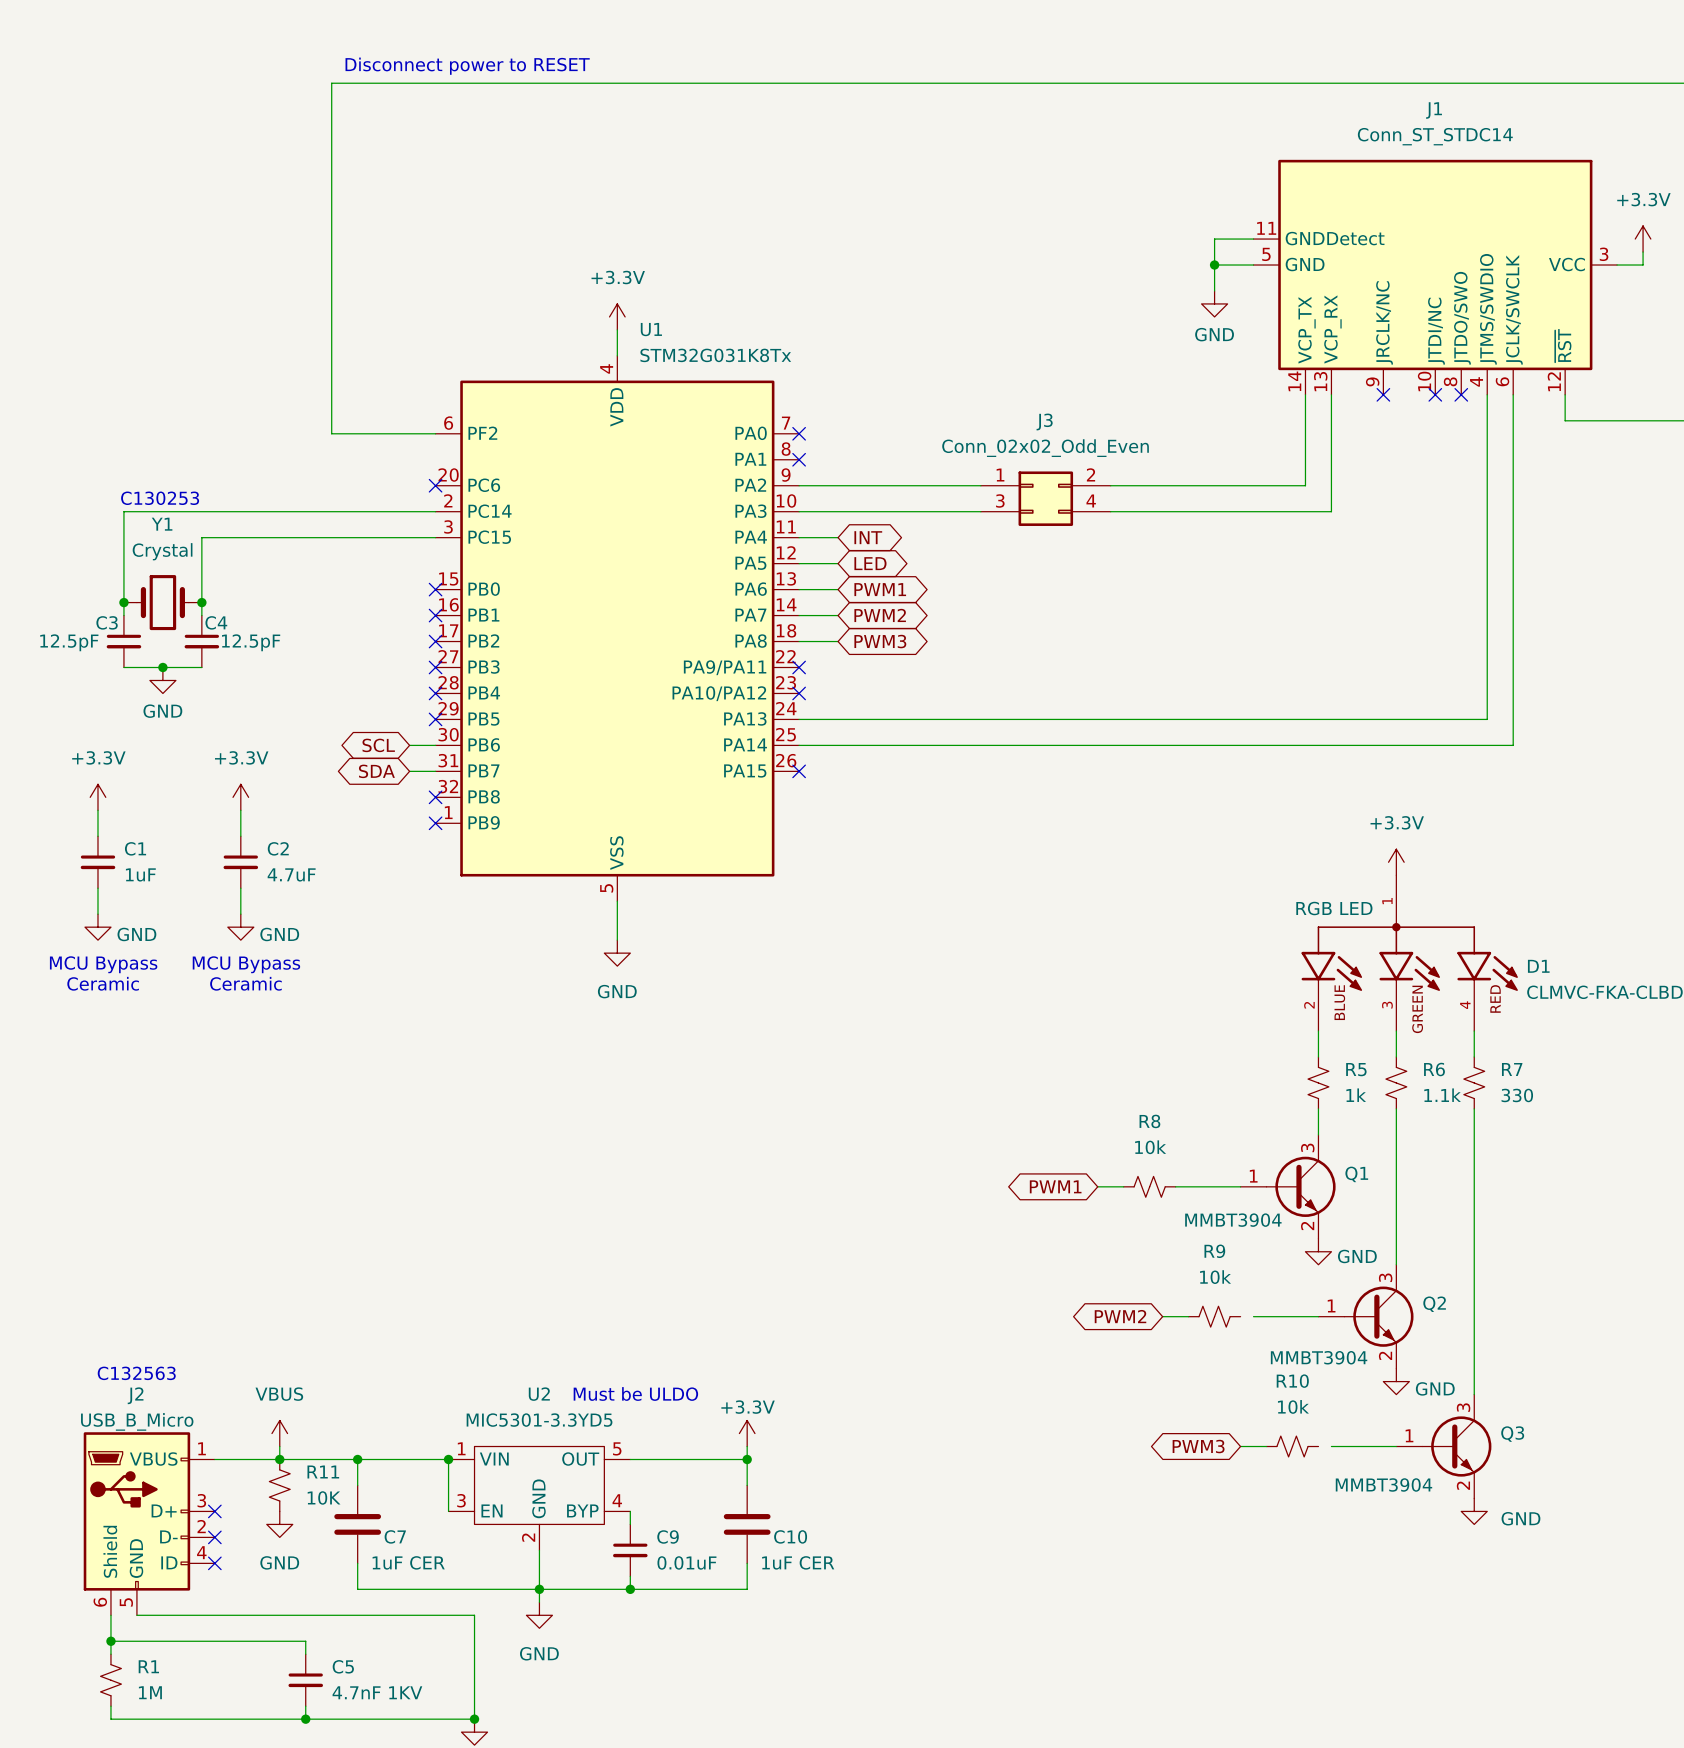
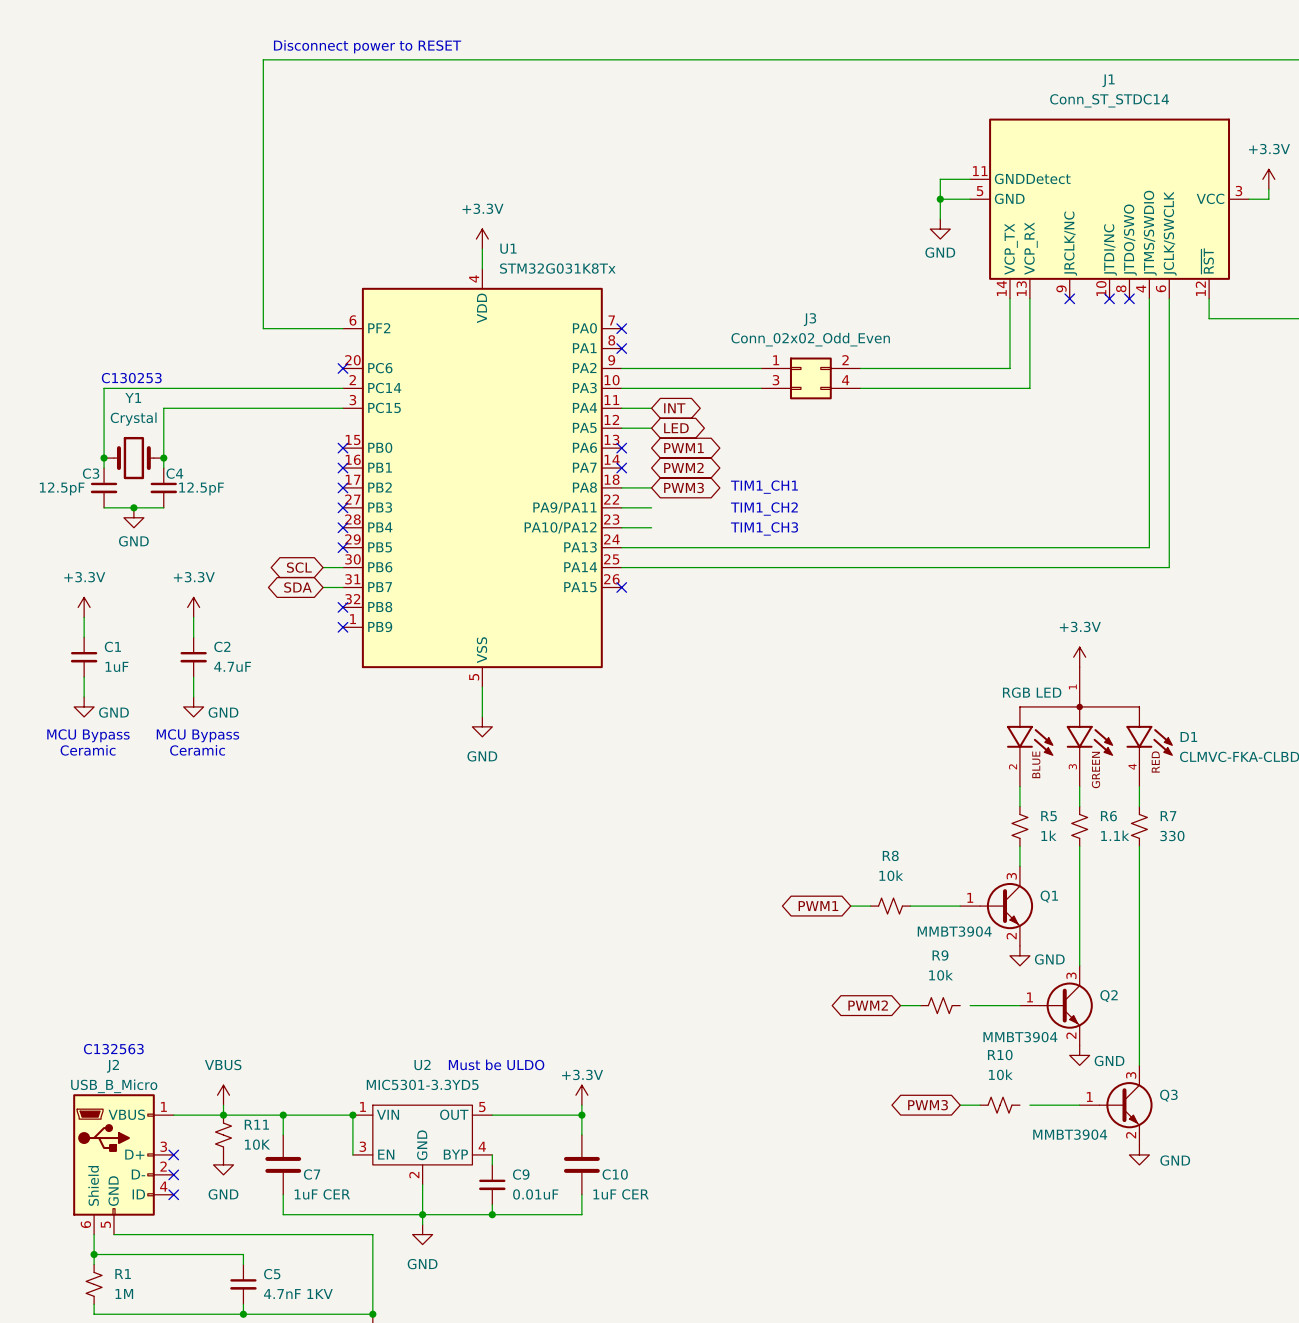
wire: (799, 589) (838, 589) -> (621, 507) (651, 507)
no-connect mark: none -> (621, 448)
wire: (799, 615) (838, 615) -> (621, 527) (651, 527)
no-connect mark: none -> (621, 468)
text: none -> TIM1_CH1 (764, 487)
no-connect mark: (799, 667) -> none
text: none -> TIM1_CH2 (764, 509)
no-connect mark: (799, 693) -> none
text: none -> TIM1_CH3 (764, 528)

